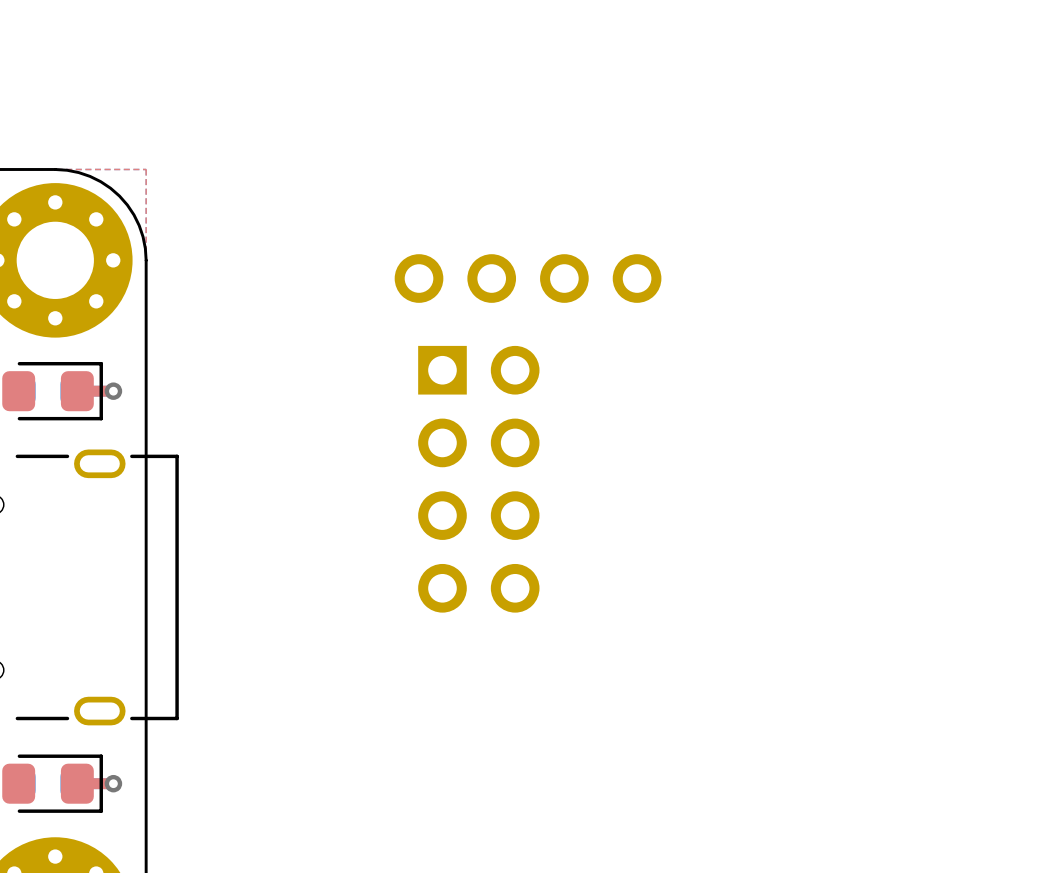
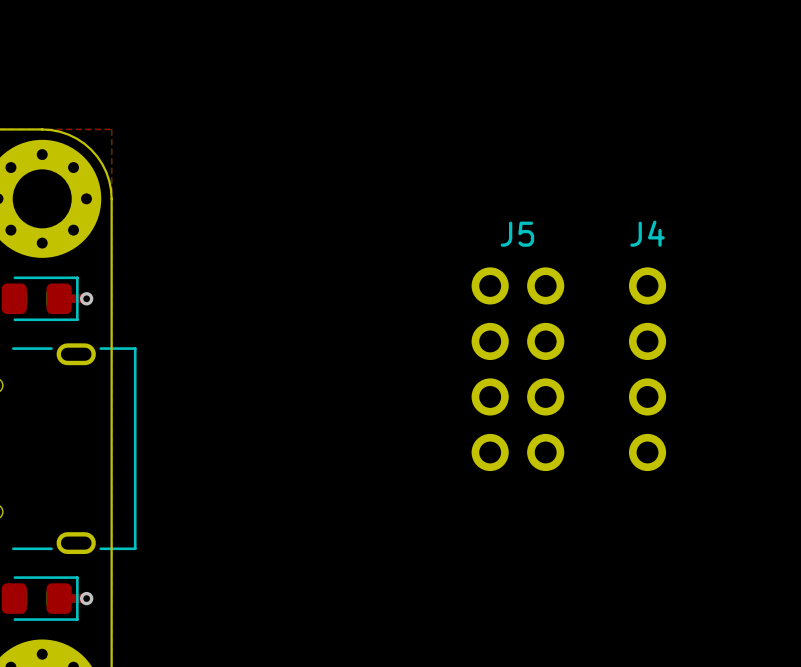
part: (528, 278) -> none
part: (478, 479) -> none
J5: none -> (517, 369)
J4: none -> (647, 369)

